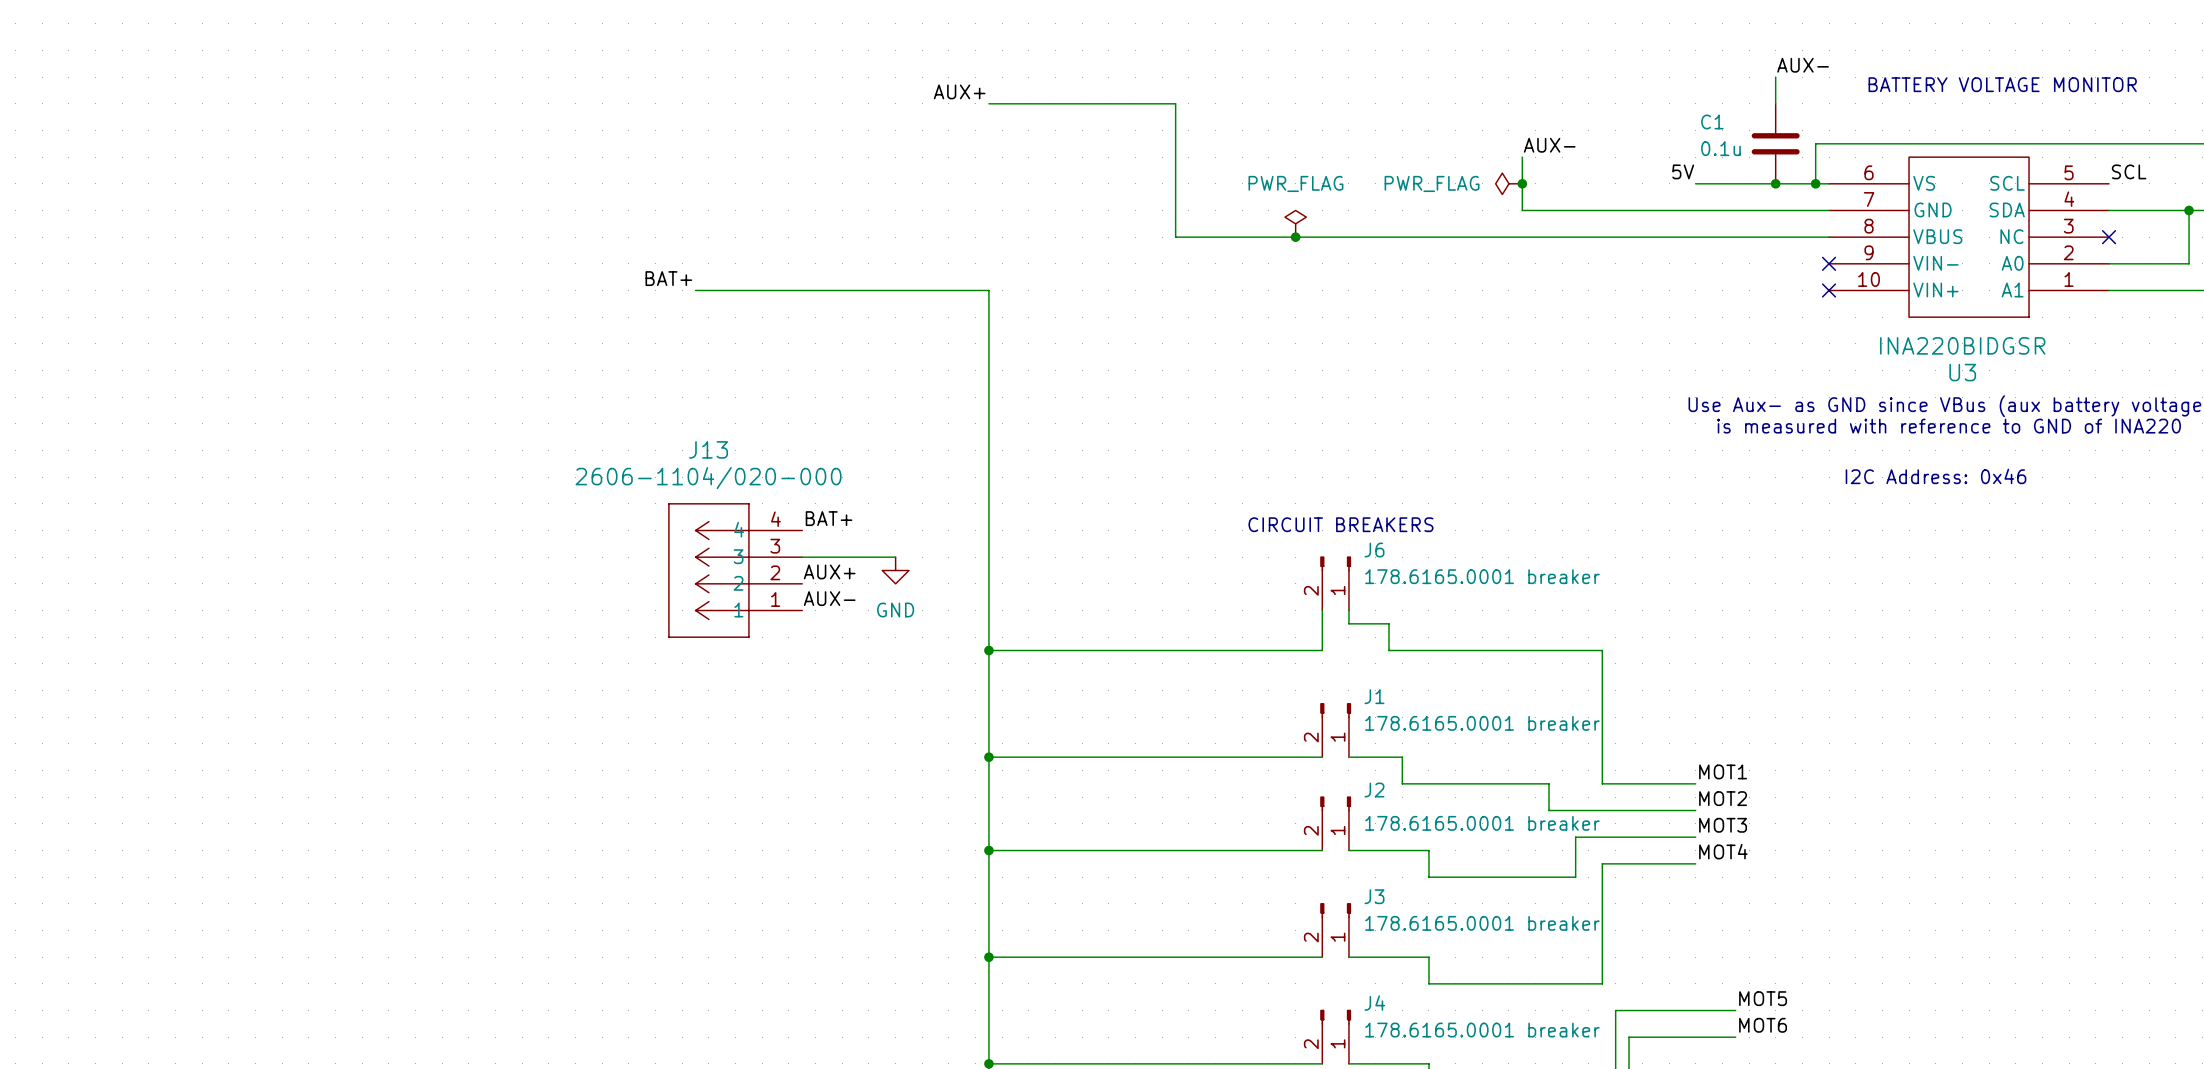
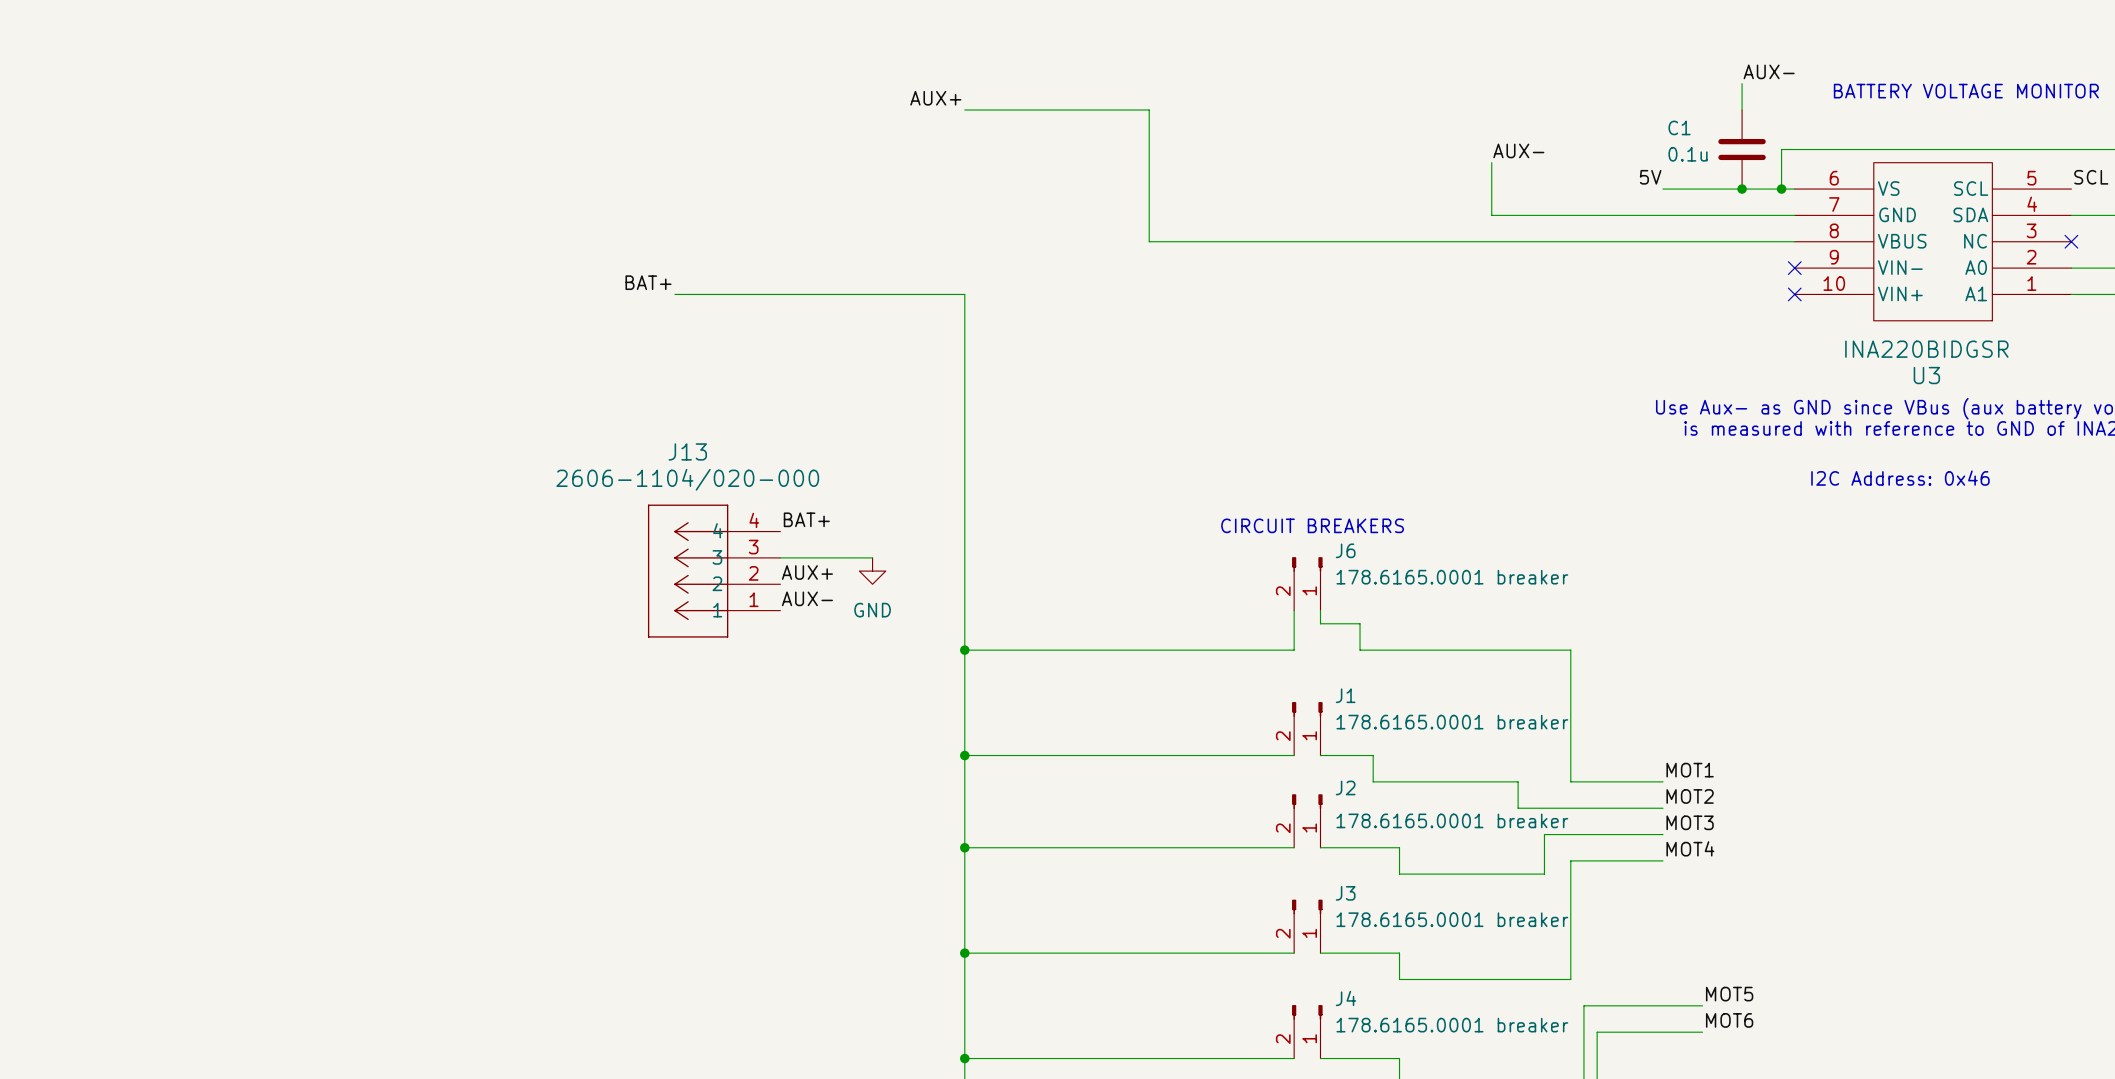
power symbol: PWR_FLAG (1508, 183) -> none
junction: (1522, 183) -> none
power symbol: PWR_FLAG (1295, 223) -> none
junction: (1295, 237) -> none

